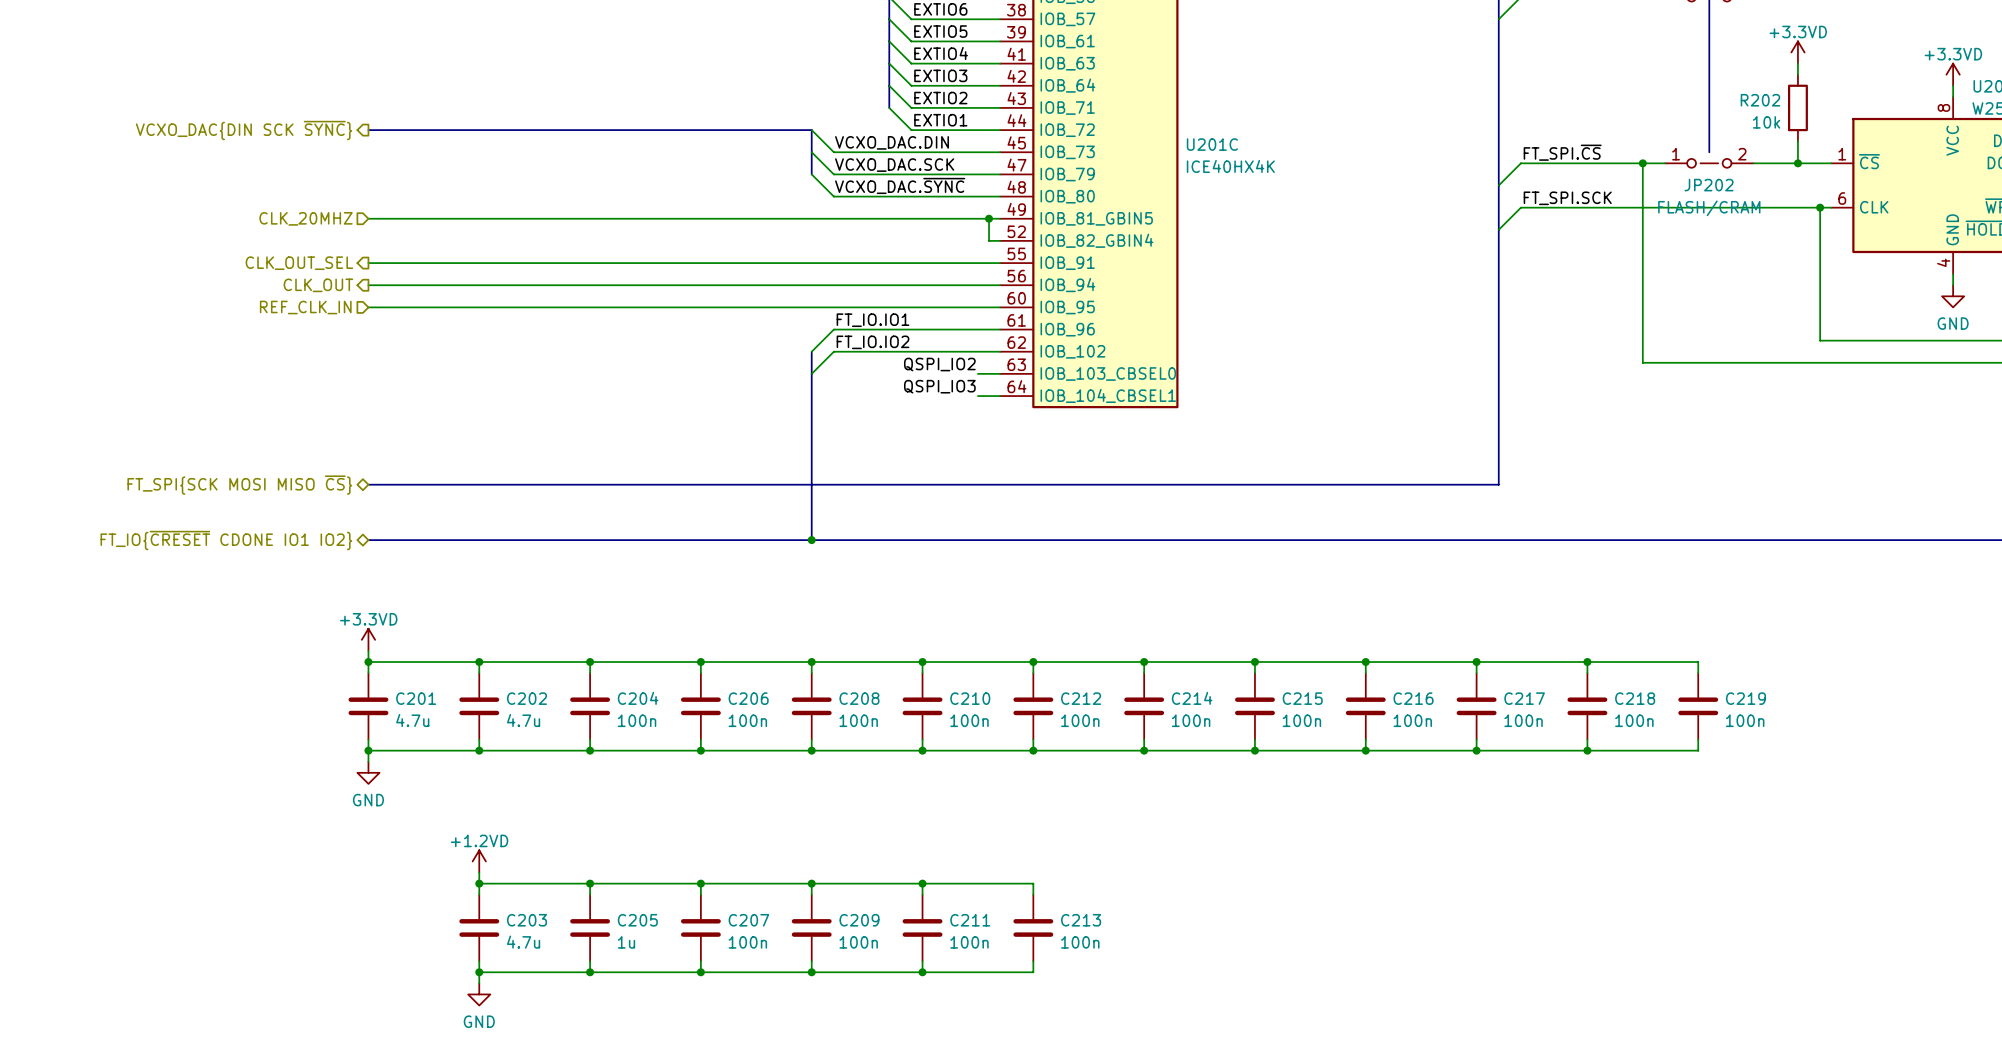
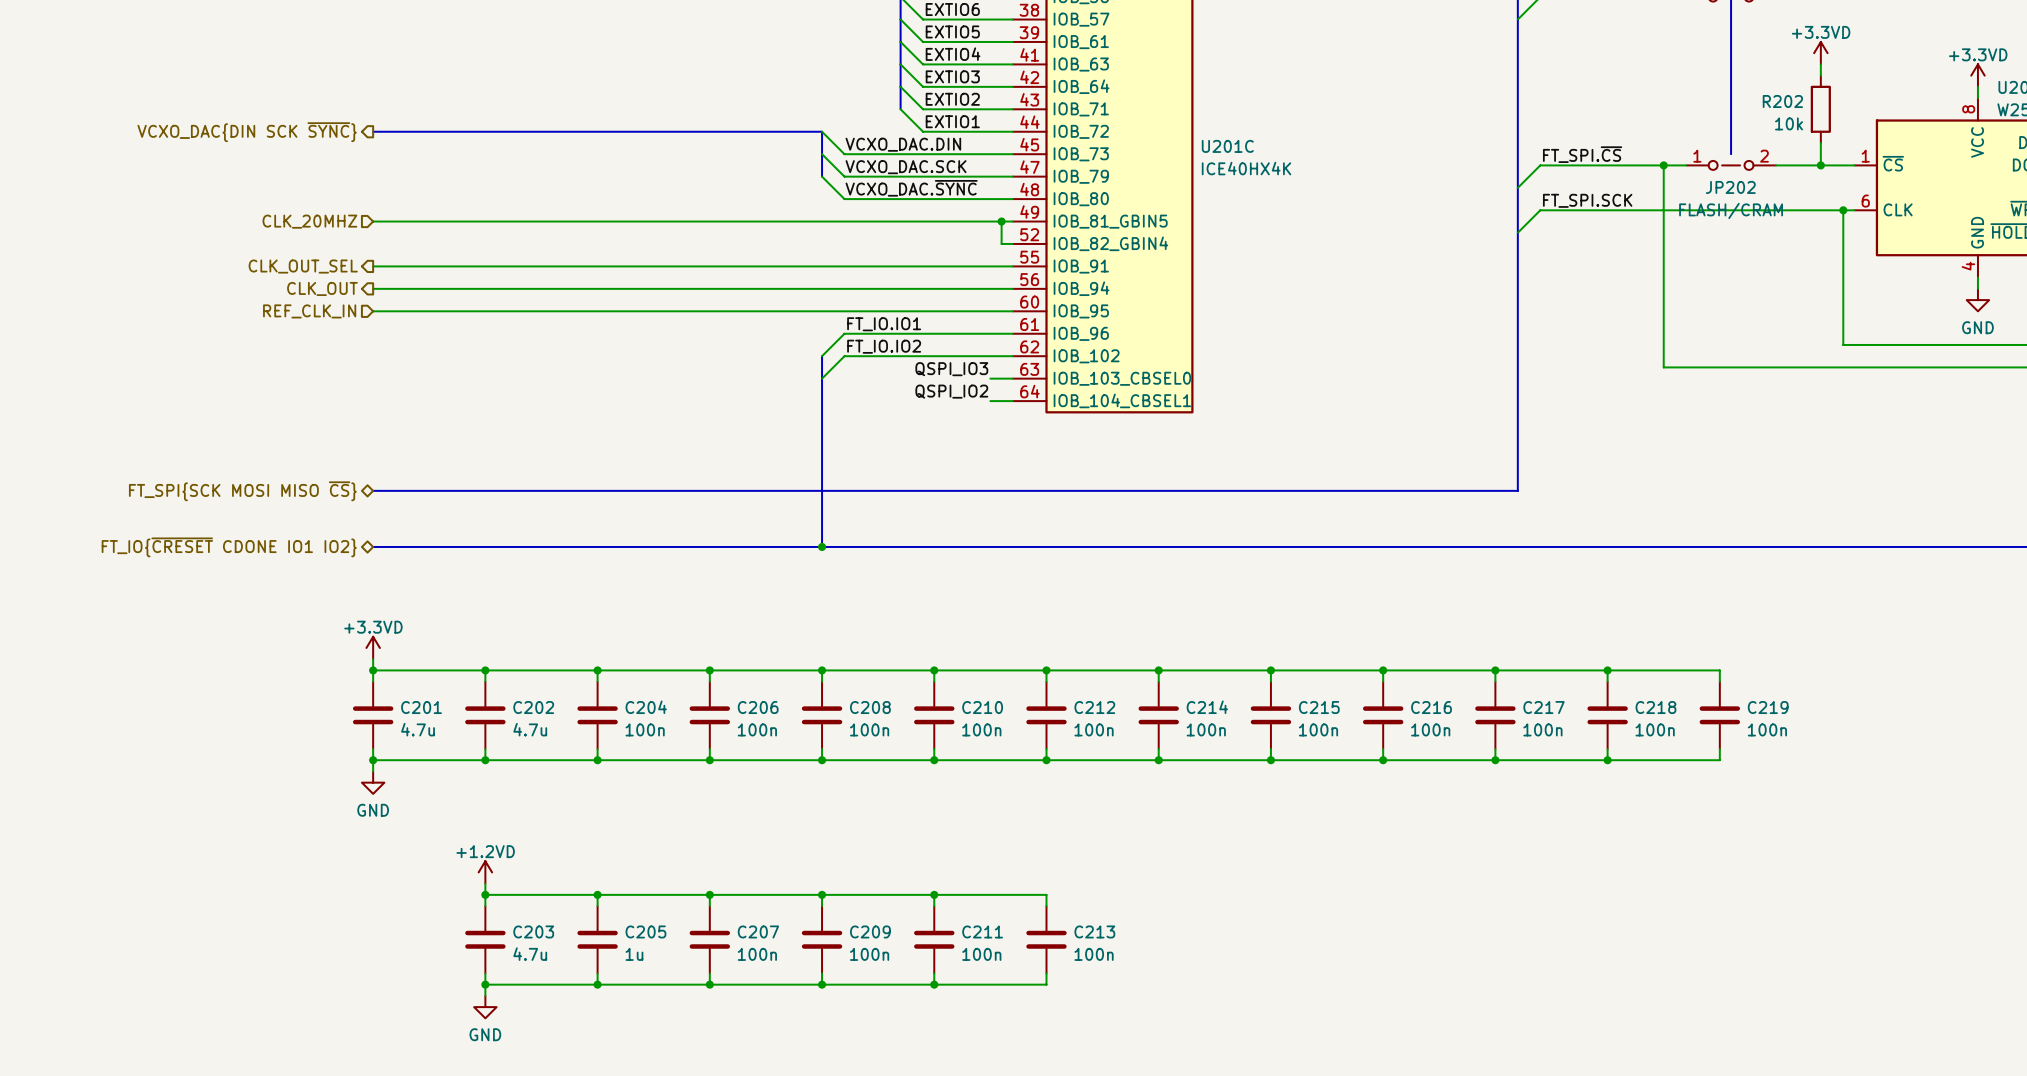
label: QSPI_IO2 (939, 364) -> QSPI_IO3 (951, 369)
label: QSPI_IO3 (939, 386) -> QSPI_IO2 (951, 391)

